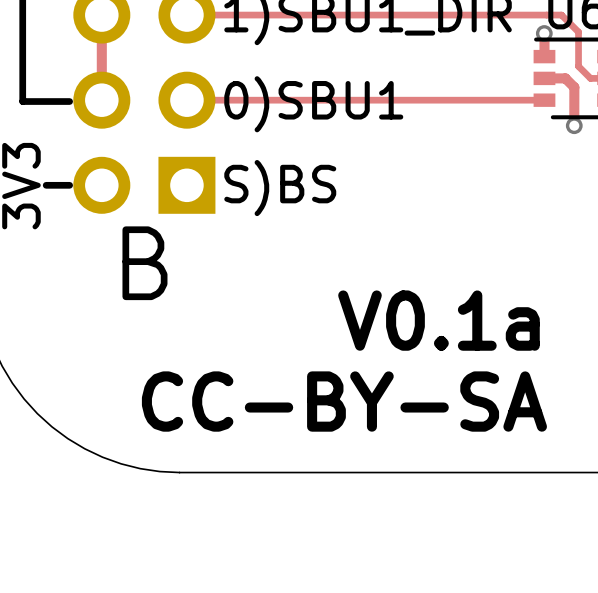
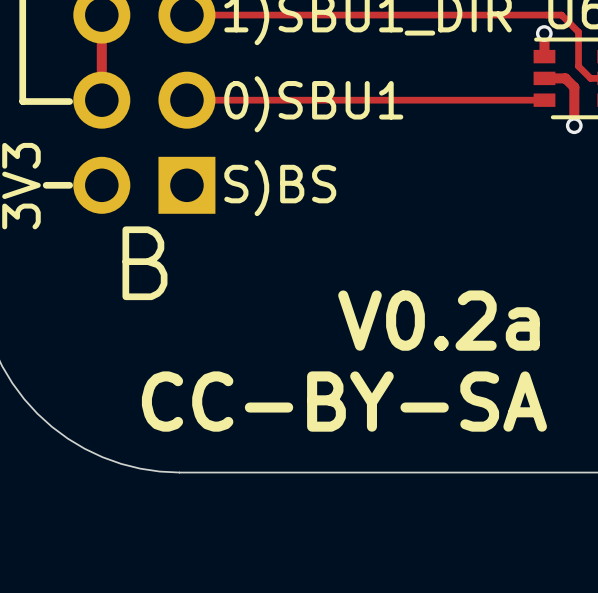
text: V0.1a (438, 320) -> V0.2a (438, 320)

